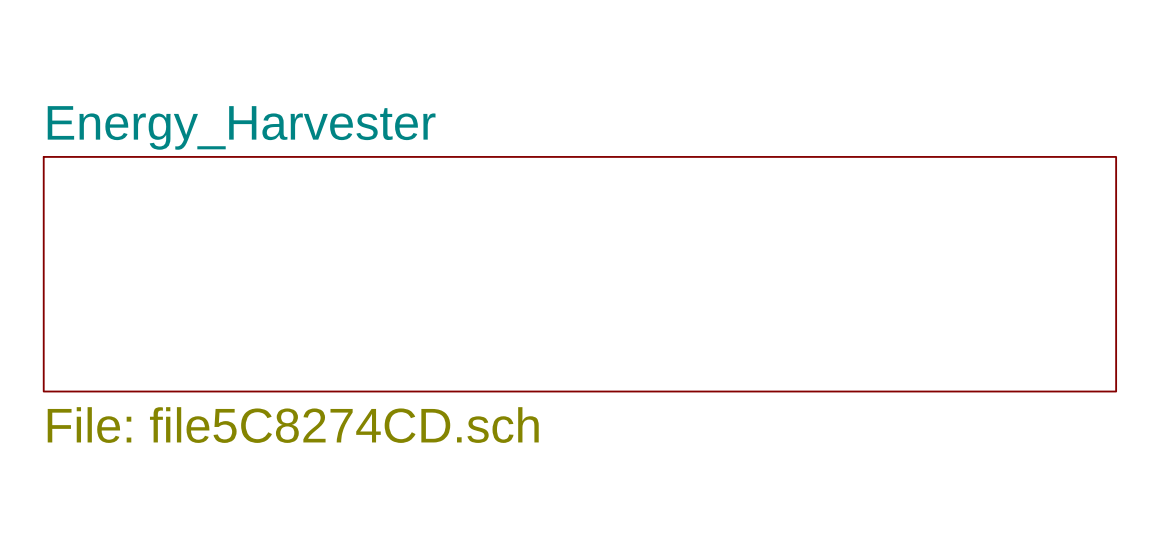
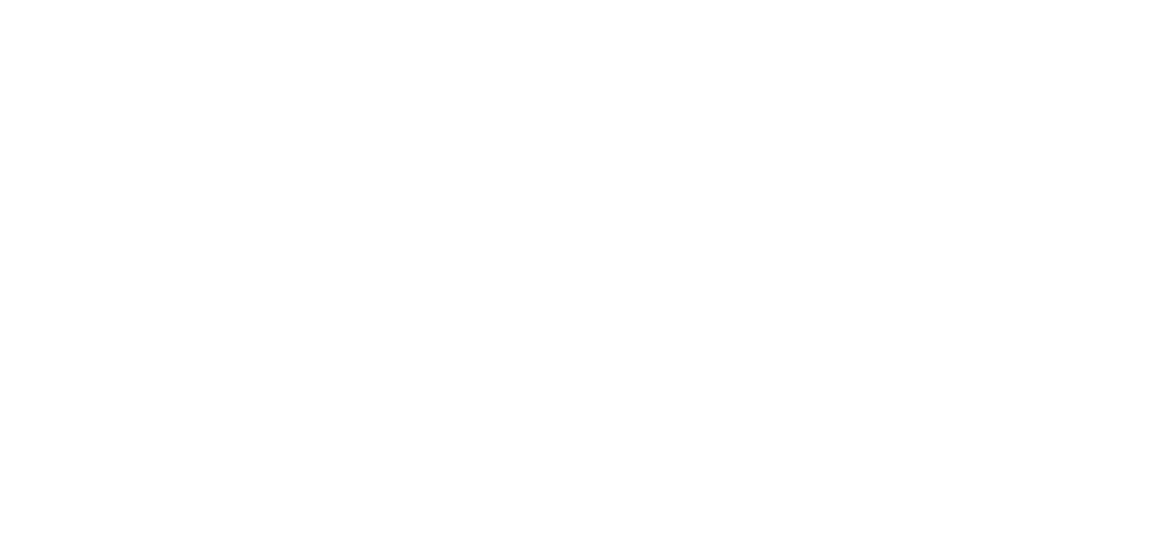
sheet Energy_Harvester: File: file5C8274CD.sch (579, 274) -> none

